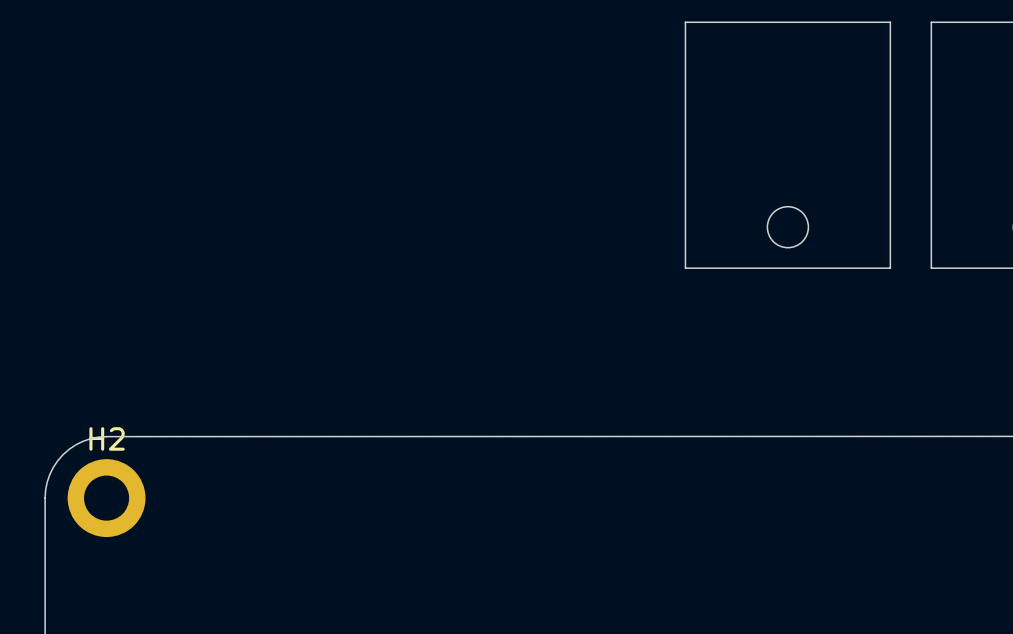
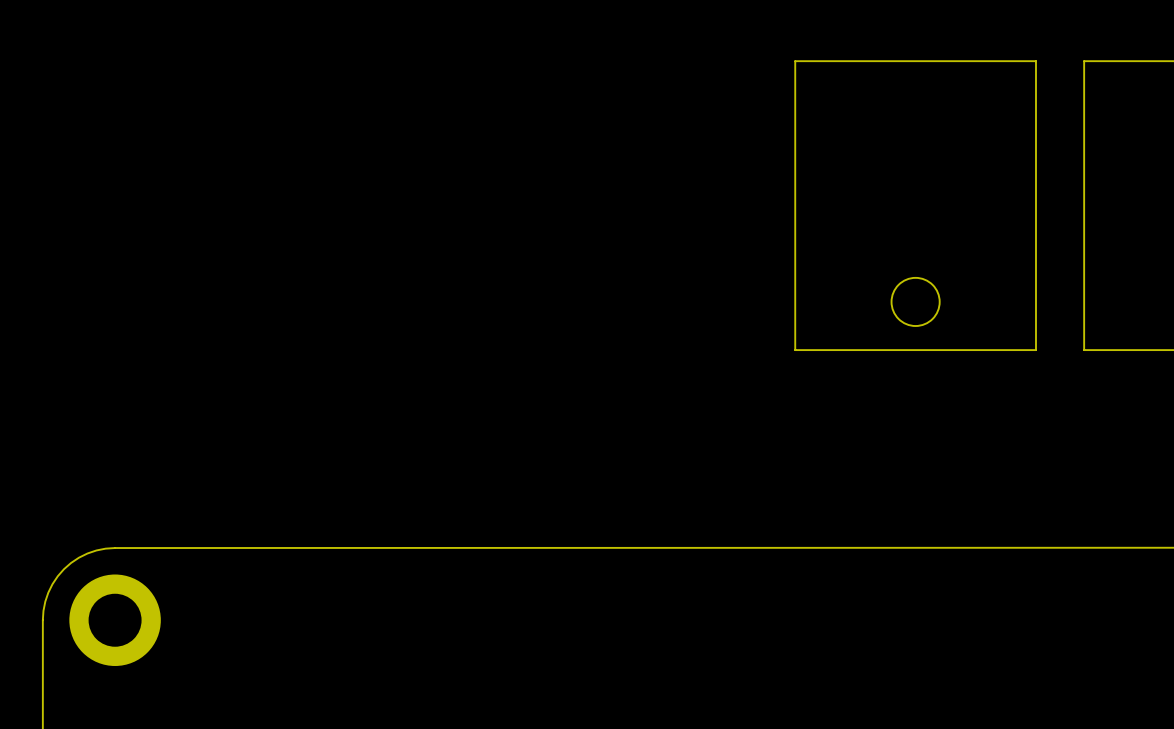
H2 name: H2 (107, 438) -> none

